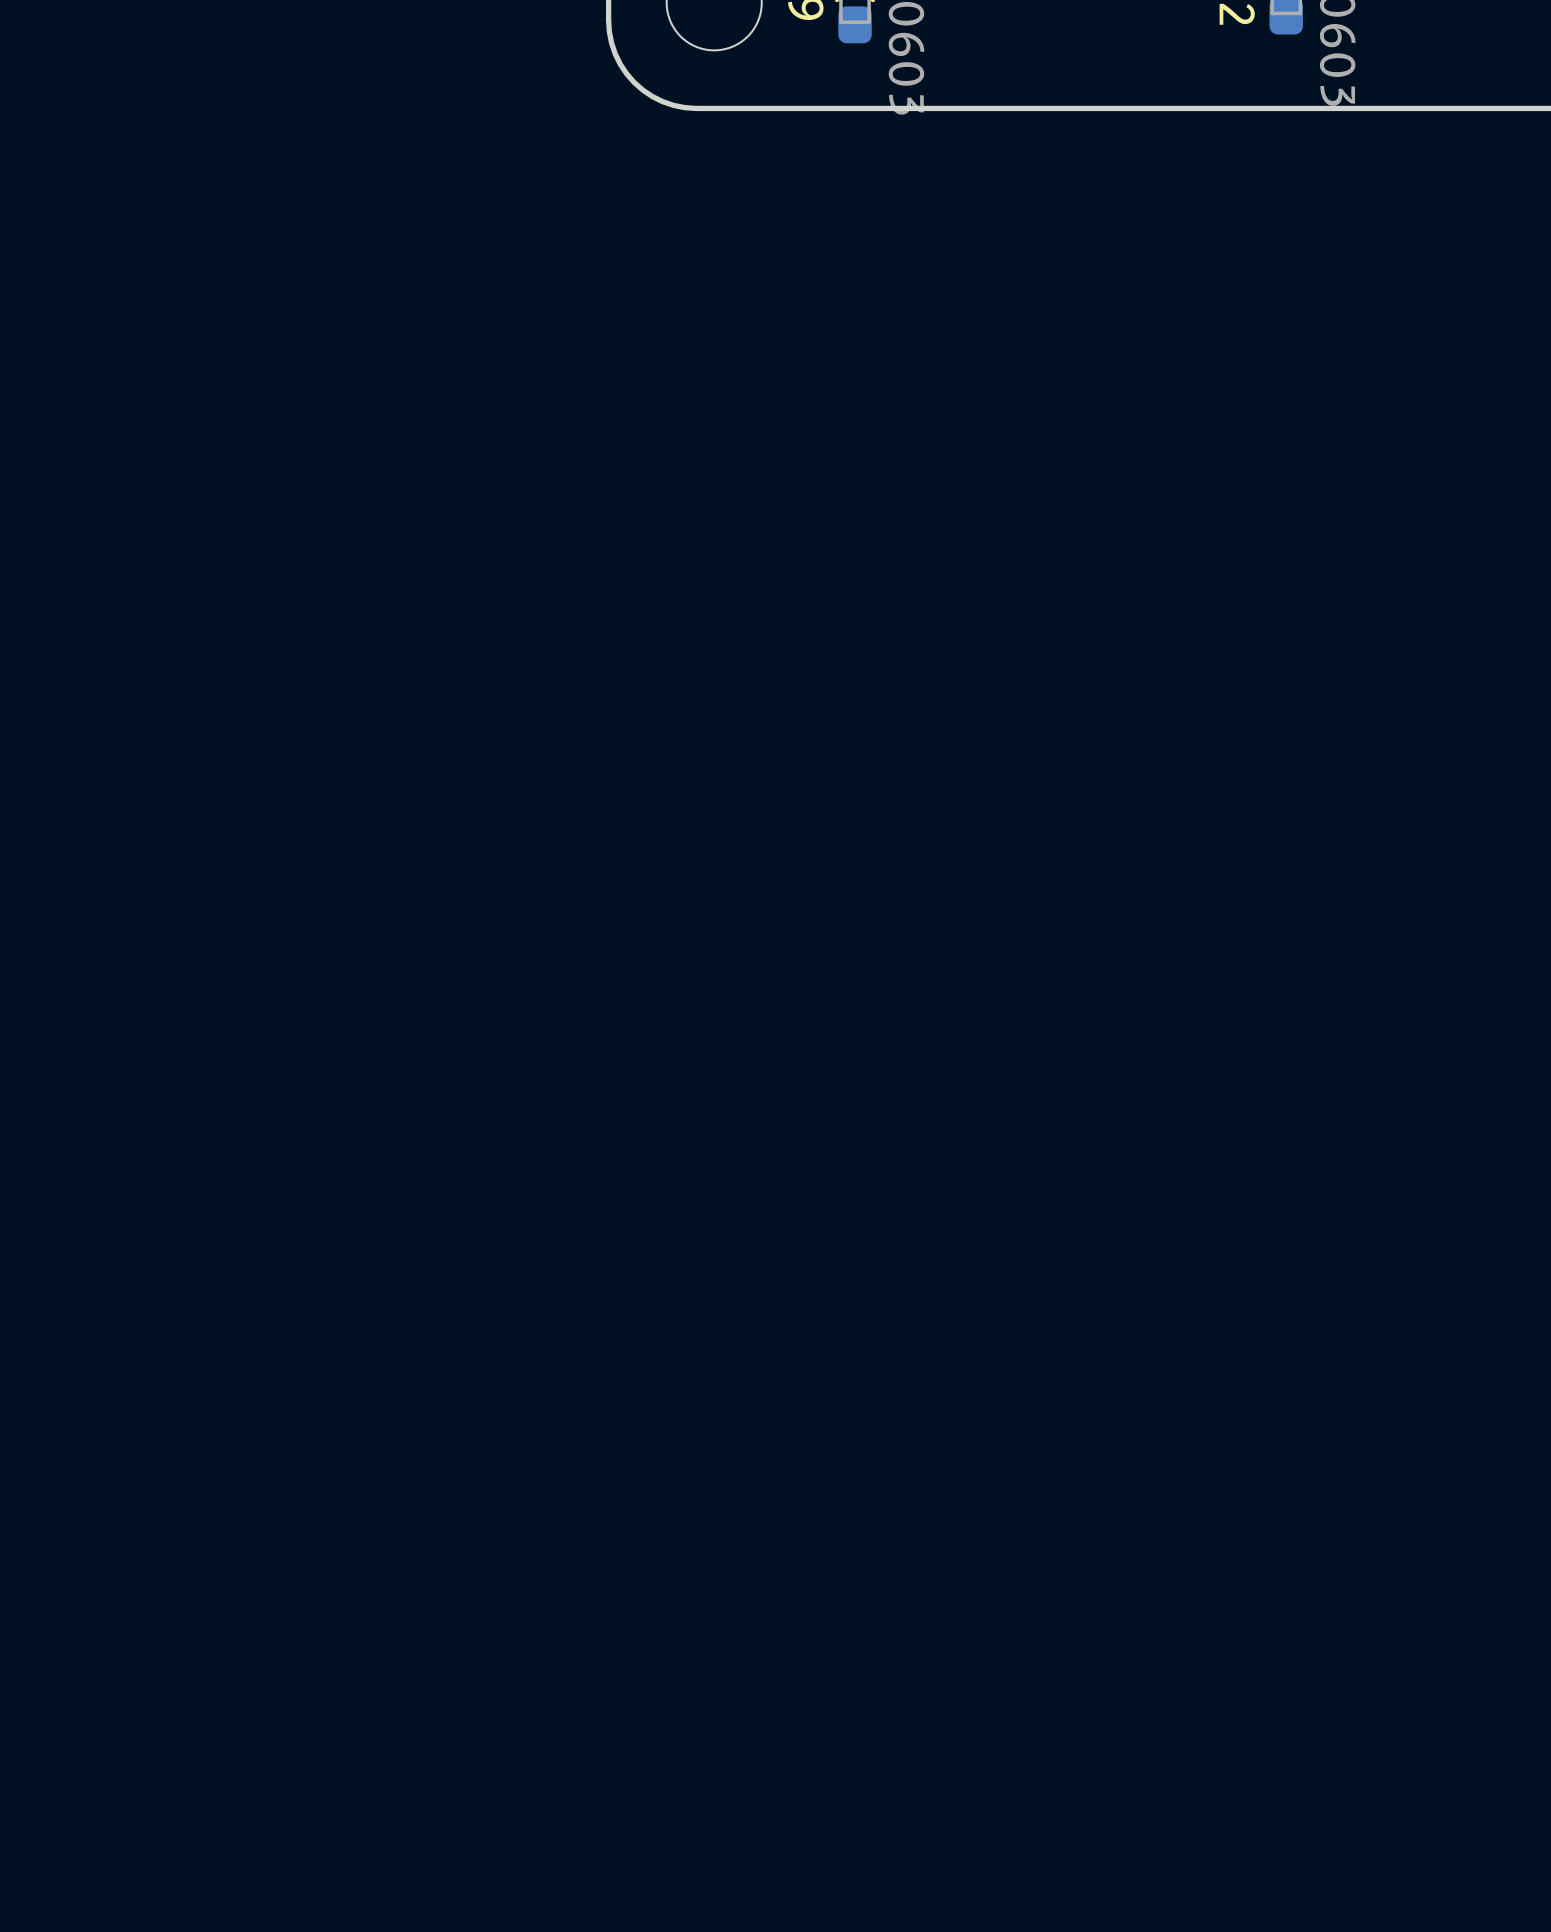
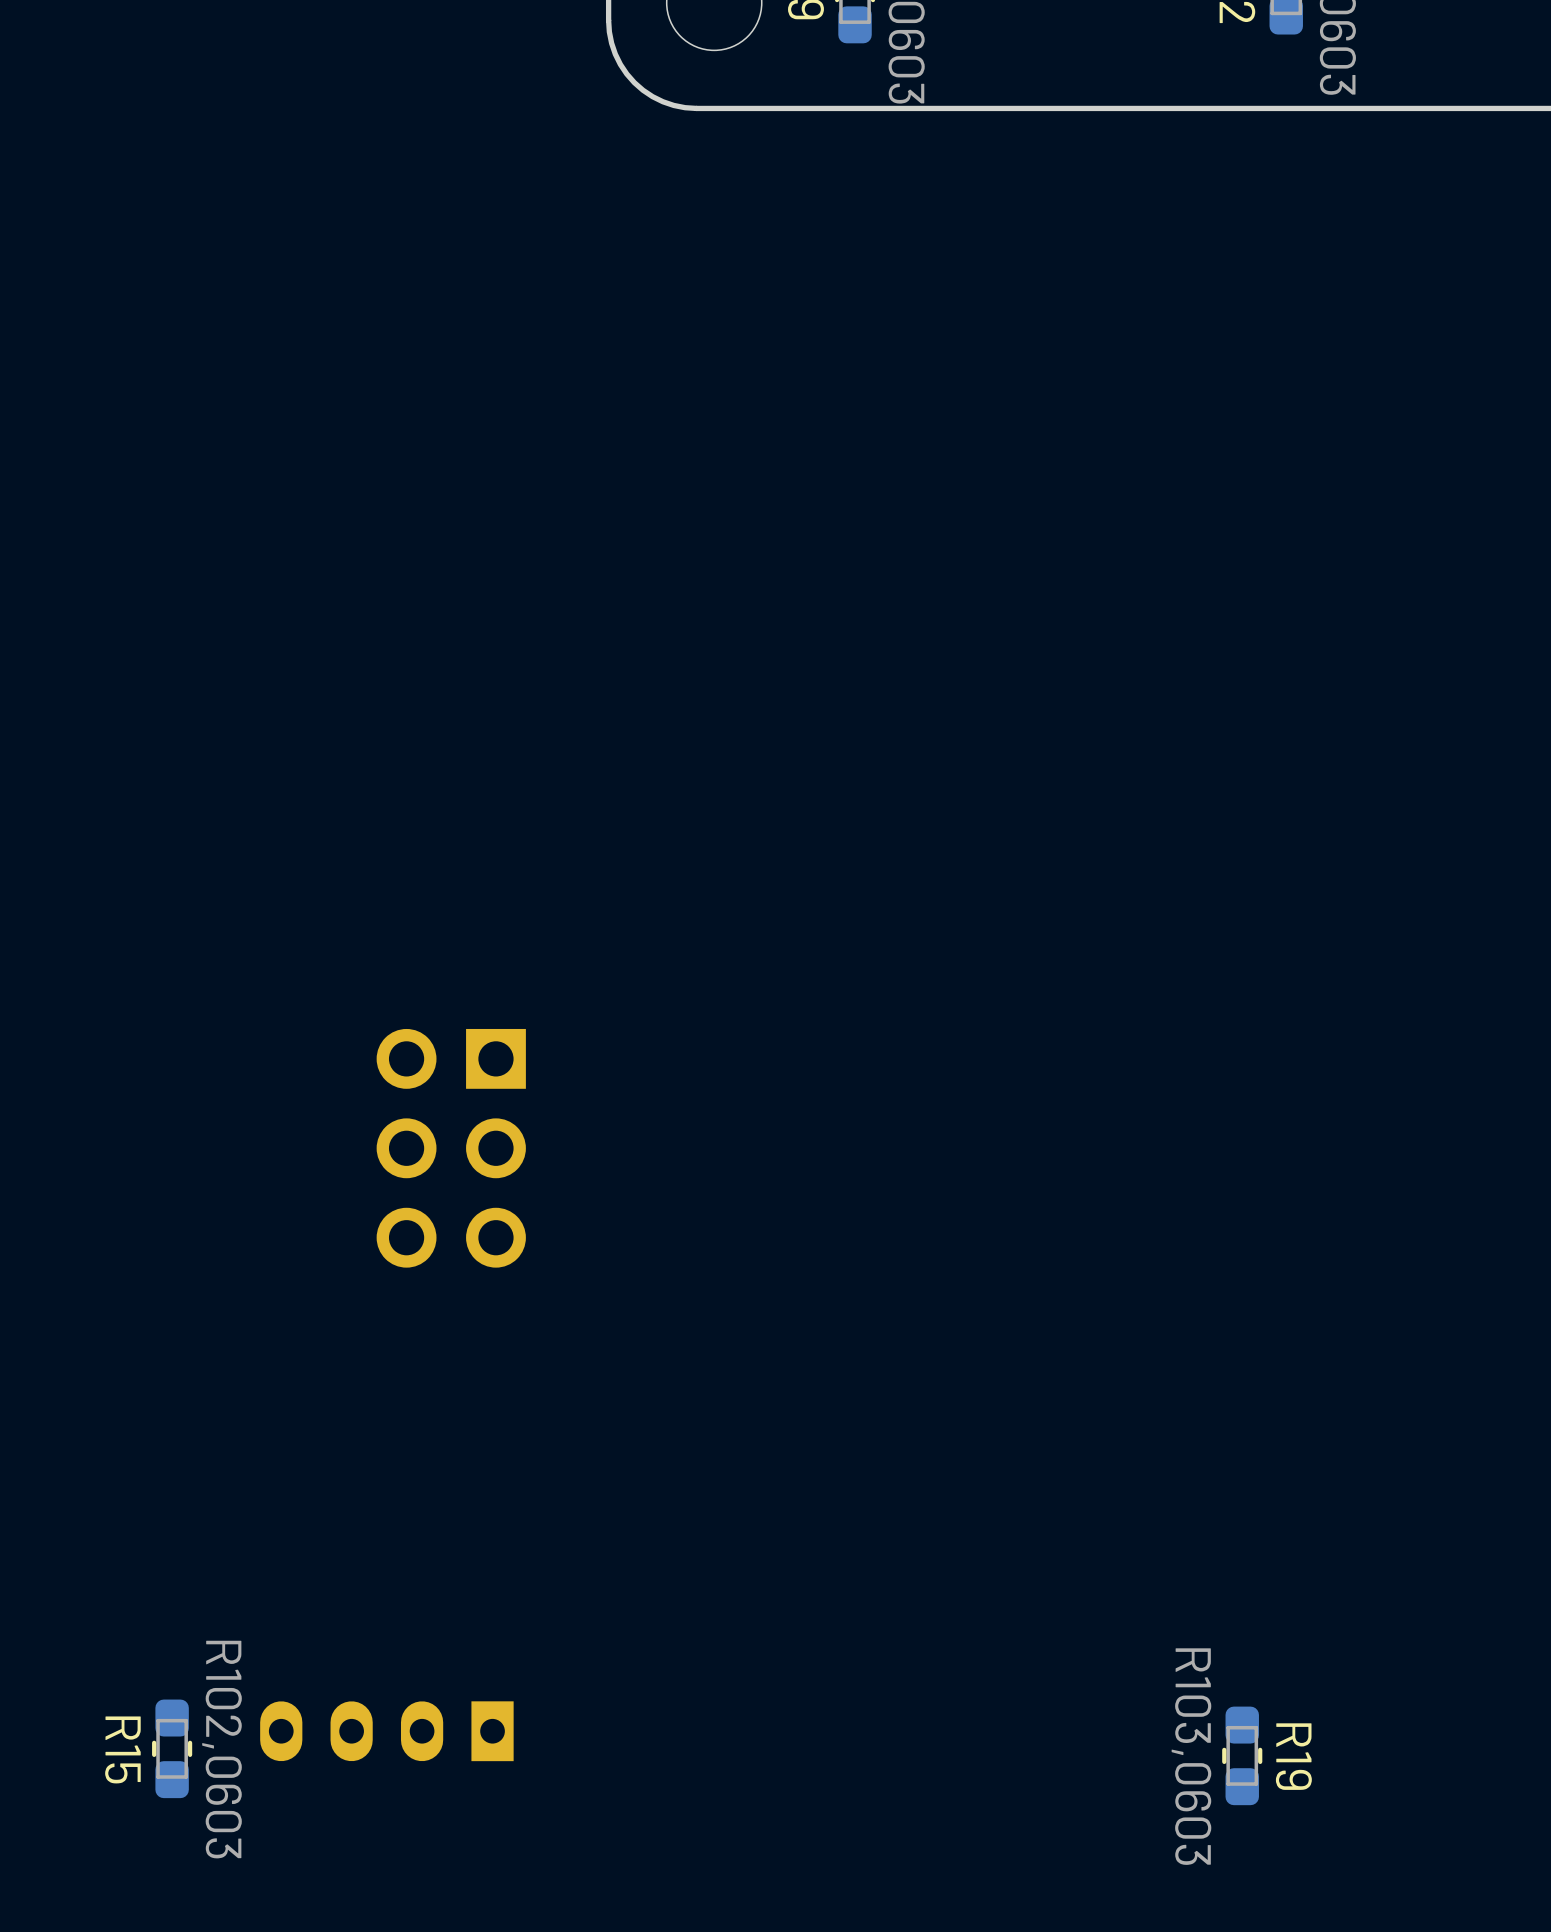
part: none -> (451, 1148)
part: none -> (386, 1731)
R15: none -> R102,0603 (172, 1748)
R19: none -> R103,0603 (1242, 1755)

